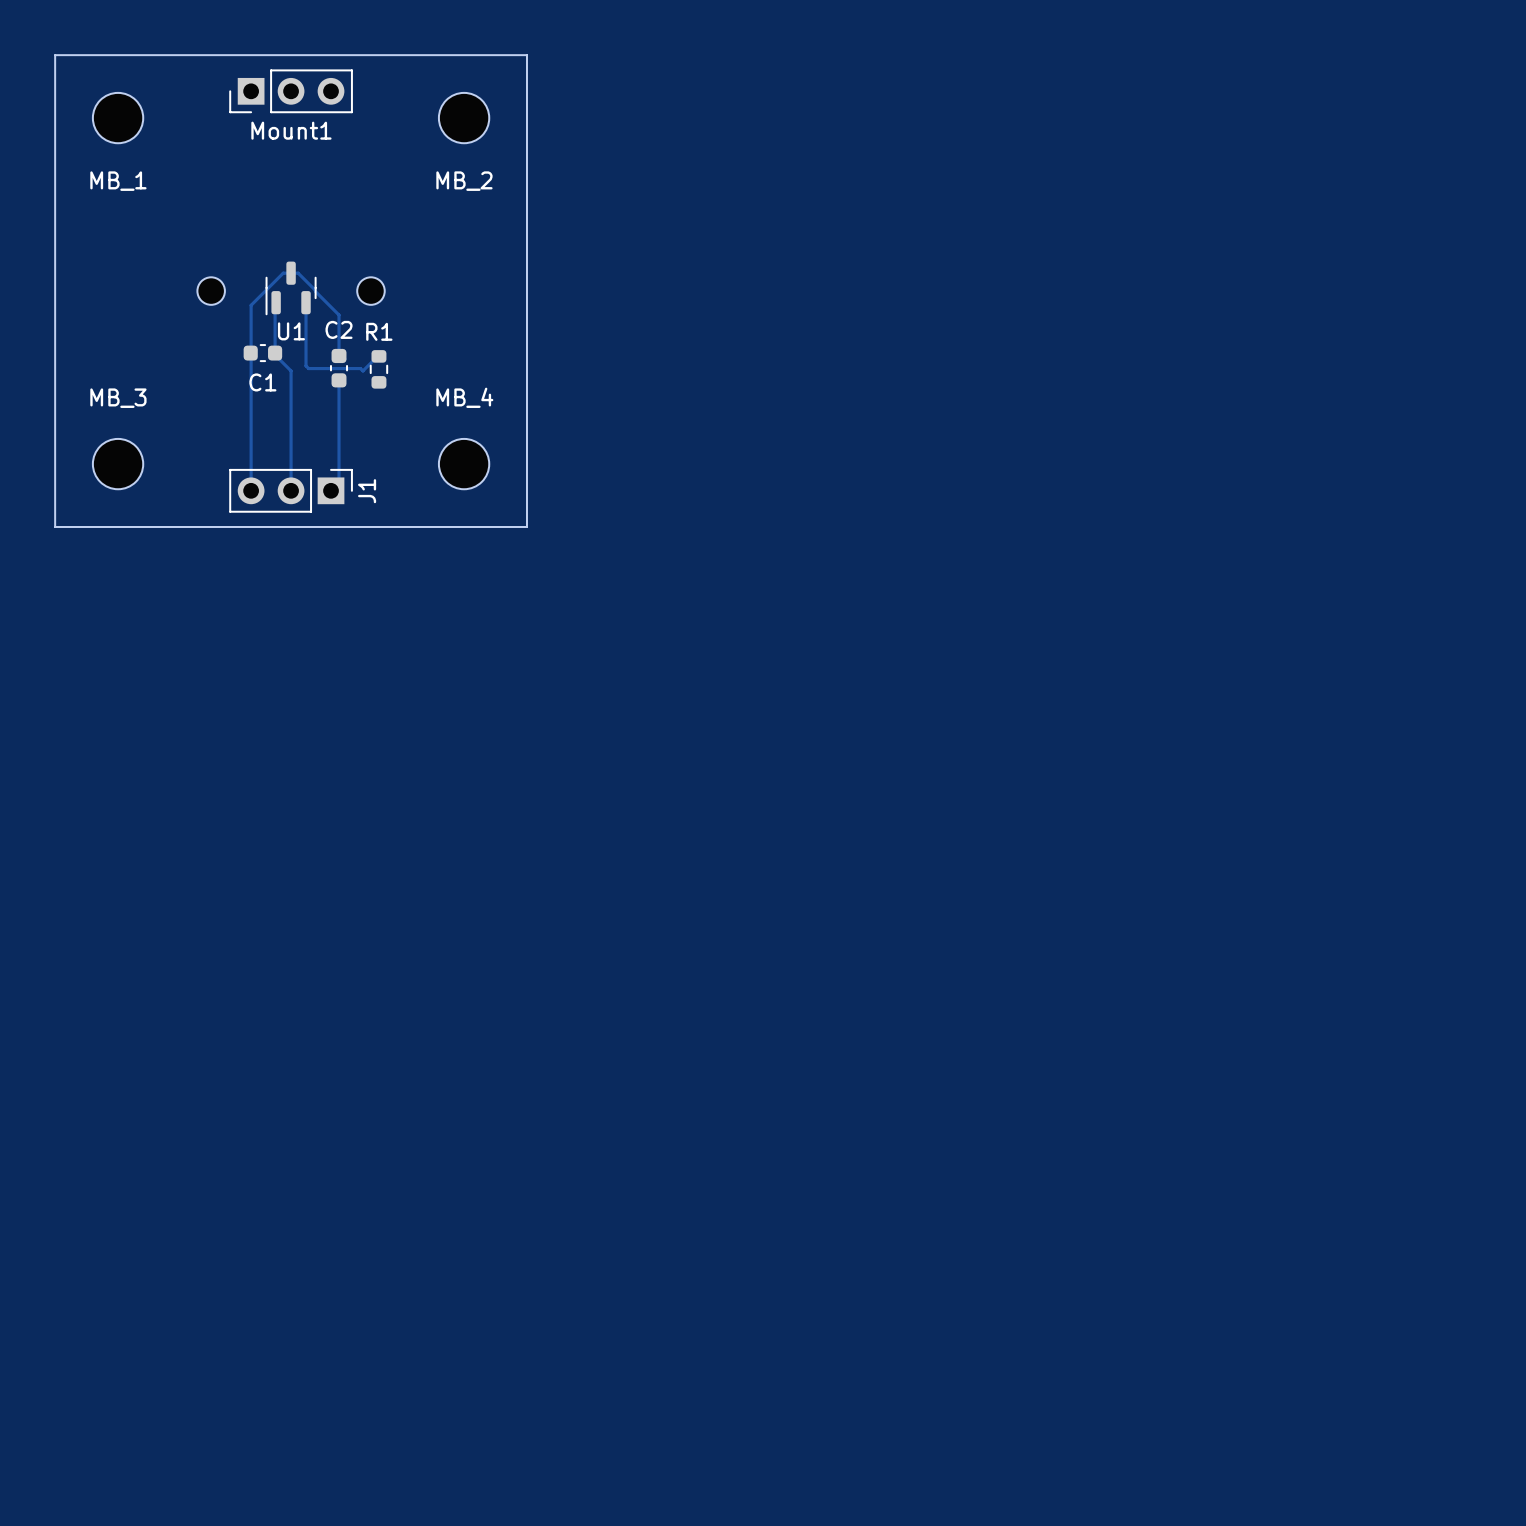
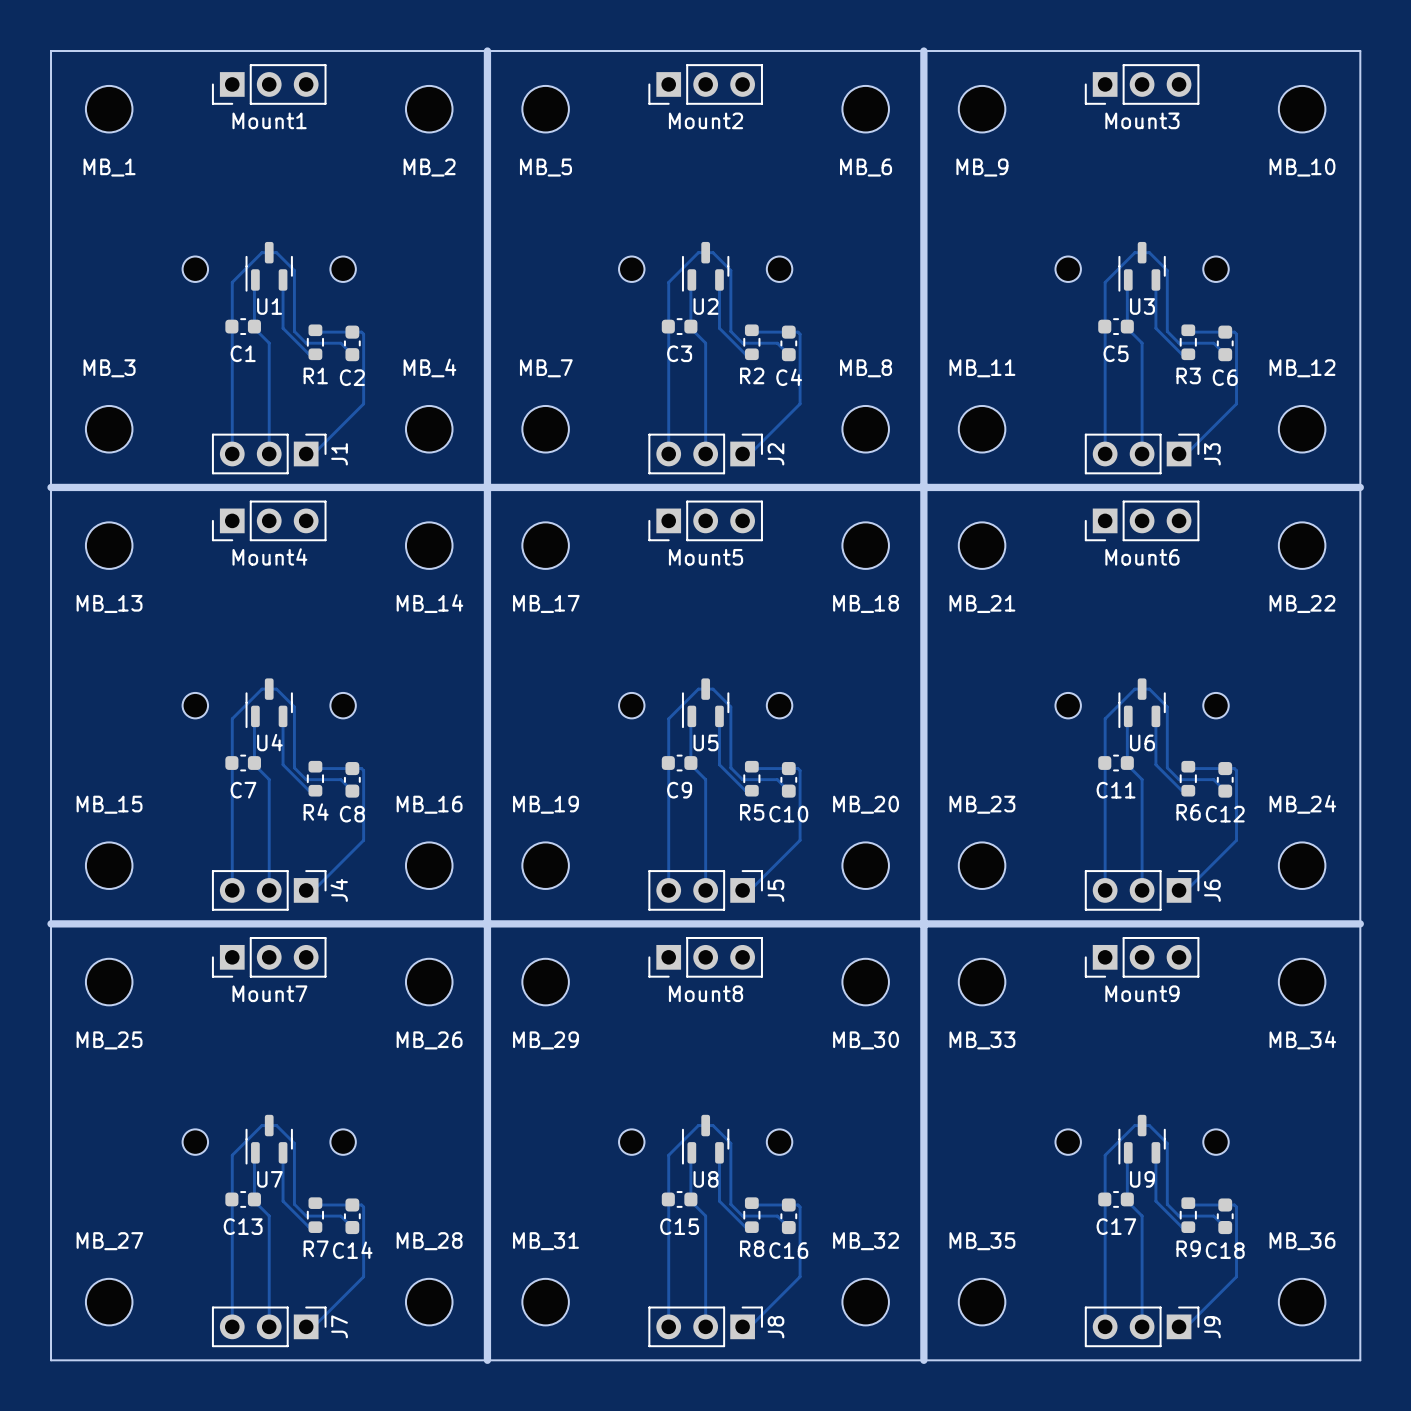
board edge: none -> (487, 51) (1360, 51) (1360, 1360) (51, 1360) (51, 487)
board edge width: thin (526, 55) (526, 526) (55, 526) -> thick (487, 51) (487, 487) (51, 487)
board edge: none -> (923, 51) (923, 1360)
Mount2: none -> (705, 84)
Mount3: none -> (1142, 84)
MB_5: none -> (545, 109)
MB_6: none -> (865, 109)
MB_9: none -> (982, 109)
MB_10: none -> (1302, 109)
track: (298, 273) (339, 315) (339, 355) (336, 358) -> (275, 252) (294, 270) (294, 331) (306, 343) (340, 343) (352, 354)
U2: none -> (705, 266)
U3: none -> (1142, 266)
track: none -> (691, 279) (690, 328) (705, 343) (705, 461)
track: none -> (719, 279) (719, 328) (745, 354) (751, 354)
track: none -> (1128, 279) (1127, 328) (1142, 343) (1142, 461)
track: none -> (1155, 279) (1155, 328) (1181, 354) (1188, 354)
C2 name position: C2 (339, 329) -> C2 (352, 377)
R1 name position: R1 (379, 331) -> R1 (315, 375)
C3: none -> (679, 326)
C5: none -> (1116, 326)
track: (306, 354) (306, 365) (308, 368) (360, 368) (362, 370) (378, 356) -> (283, 328) (309, 354)
track: none -> (751, 330) (755, 332) (798, 332) (800, 334) (800, 403) (742, 461)
track: none -> (1188, 330) (1191, 332) (1234, 332) (1236, 334) (1236, 403) (1179, 461)
track: none -> (319, 332) (361, 332) (363, 334) (363, 403) (313, 453)
C2 position: (339, 368) -> (352, 343)
R1 position: (378, 369) -> (315, 342)
R2: none -> (751, 342)
R3: none -> (1188, 342)
C4: none -> (788, 343)
C6: none -> (1225, 343)
track: (339, 380) (339, 482) (331, 490) -> none
track: none -> (788, 354) (777, 343) (742, 343) (730, 331) (730, 270) (713, 252) (698, 252) (668, 282) (668, 461) (670, 459)
track: none -> (1225, 354) (1213, 343) (1179, 343) (1167, 331) (1167, 270) (1149, 252) (1134, 252) (1105, 282) (1105, 461) (1106, 459)
MB_7: none -> (545, 429)
MB_8: none -> (865, 429)
MB_11: none -> (982, 429)
MB_12: none -> (1302, 429)
J2: none -> (705, 453)
J3: none -> (1142, 453)
board edge: none -> (1360, 487) (487, 487) (487, 1360)
Mount4: none -> (269, 520)
Mount5: none -> (705, 520)
Mount6: none -> (1142, 520)
MB_13: none -> (109, 545)
MB_14: none -> (429, 545)
MB_17: none -> (545, 545)
MB_18: none -> (865, 545)
MB_21: none -> (982, 545)
MB_22: none -> (1302, 545)
U4: none -> (269, 703)
U5: none -> (705, 703)
U6: none -> (1142, 703)
track: none -> (255, 716) (254, 764) (269, 779) (269, 897)
track: none -> (283, 716) (283, 764) (309, 790) (315, 790)
track: none -> (691, 716) (690, 764) (705, 779) (705, 897)
track: none -> (719, 716) (719, 764) (745, 790) (751, 790)
track: none -> (1128, 716) (1127, 764) (1142, 779) (1142, 897)
track: none -> (1155, 716) (1155, 764) (1181, 790) (1188, 790)
C7: none -> (243, 763)
C9: none -> (679, 763)
C11: none -> (1116, 763)
track: none -> (315, 766) (319, 768) (361, 768) (363, 770) (363, 840) (306, 897)
track: none -> (751, 766) (755, 768) (798, 768) (800, 770) (800, 840) (742, 897)
track: none -> (1188, 766) (1191, 768) (1234, 768) (1236, 770) (1236, 840) (1179, 897)
R4: none -> (315, 778)
R5: none -> (751, 778)
R6: none -> (1188, 778)
C8: none -> (352, 779)
C10: none -> (788, 779)
C12: none -> (1225, 779)
track: none -> (352, 791) (340, 779) (306, 779) (294, 767) (294, 706) (276, 689) (261, 689) (232, 718) (232, 897) (234, 895)
track: none -> (788, 791) (777, 779) (742, 779) (730, 767) (730, 706) (713, 689) (698, 689) (668, 718) (668, 897) (670, 895)
track: none -> (1225, 791) (1213, 779) (1179, 779) (1167, 767) (1167, 706) (1149, 689) (1134, 689) (1105, 718) (1105, 897) (1106, 895)
MB_15: none -> (109, 865)
MB_16: none -> (429, 865)
MB_19: none -> (545, 865)
MB_20: none -> (865, 865)
MB_23: none -> (982, 865)
MB_24: none -> (1302, 865)
J4: none -> (269, 890)
J5: none -> (705, 890)
J6: none -> (1142, 890)
board edge: none -> (51, 923) (1360, 923)
Mount7: none -> (269, 957)
Mount8: none -> (705, 957)
Mount9: none -> (1142, 957)
MB_25: none -> (109, 982)
MB_26: none -> (429, 982)
MB_29: none -> (545, 982)
MB_30: none -> (865, 982)
MB_33: none -> (982, 982)
MB_34: none -> (1302, 982)
U7: none -> (269, 1139)
U8: none -> (705, 1139)
U9: none -> (1142, 1139)
track: none -> (255, 1152) (254, 1201) (269, 1216) (269, 1334)
track: none -> (283, 1152) (283, 1201) (309, 1227) (315, 1227)
track: none -> (691, 1152) (690, 1201) (705, 1216) (705, 1334)
track: none -> (719, 1152) (719, 1201) (745, 1227) (751, 1227)
track: none -> (1128, 1152) (1127, 1201) (1142, 1216) (1142, 1334)
track: none -> (1155, 1152) (1155, 1201) (1181, 1227) (1188, 1227)
C13: none -> (243, 1199)
C15: none -> (679, 1199)
C17: none -> (1116, 1199)
track: none -> (315, 1203) (319, 1204) (361, 1204) (363, 1207) (363, 1276) (306, 1334)
track: none -> (751, 1203) (755, 1204) (798, 1204) (800, 1207) (800, 1276) (742, 1334)
track: none -> (1188, 1203) (1191, 1204) (1234, 1204) (1236, 1207) (1236, 1276) (1179, 1334)
R7: none -> (315, 1215)
R8: none -> (751, 1215)
R9: none -> (1188, 1215)
C14: none -> (352, 1216)
C16: none -> (788, 1216)
C18: none -> (1225, 1216)
track: none -> (352, 1227) (340, 1216) (306, 1216) (294, 1204) (294, 1143) (276, 1125) (261, 1125) (232, 1155) (232, 1334) (234, 1332)
track: none -> (788, 1227) (777, 1216) (742, 1216) (730, 1204) (730, 1143) (713, 1125) (698, 1125) (668, 1155) (668, 1334) (670, 1332)
track: none -> (1225, 1227) (1213, 1216) (1179, 1216) (1167, 1204) (1167, 1143) (1149, 1125) (1134, 1125) (1105, 1155) (1105, 1334) (1106, 1332)
MB_27: none -> (109, 1302)
MB_28: none -> (429, 1302)
MB_31: none -> (545, 1302)
MB_32: none -> (865, 1302)
MB_35: none -> (982, 1302)
MB_36: none -> (1302, 1302)
J7: none -> (269, 1326)
J8: none -> (705, 1326)
J9: none -> (1142, 1326)

